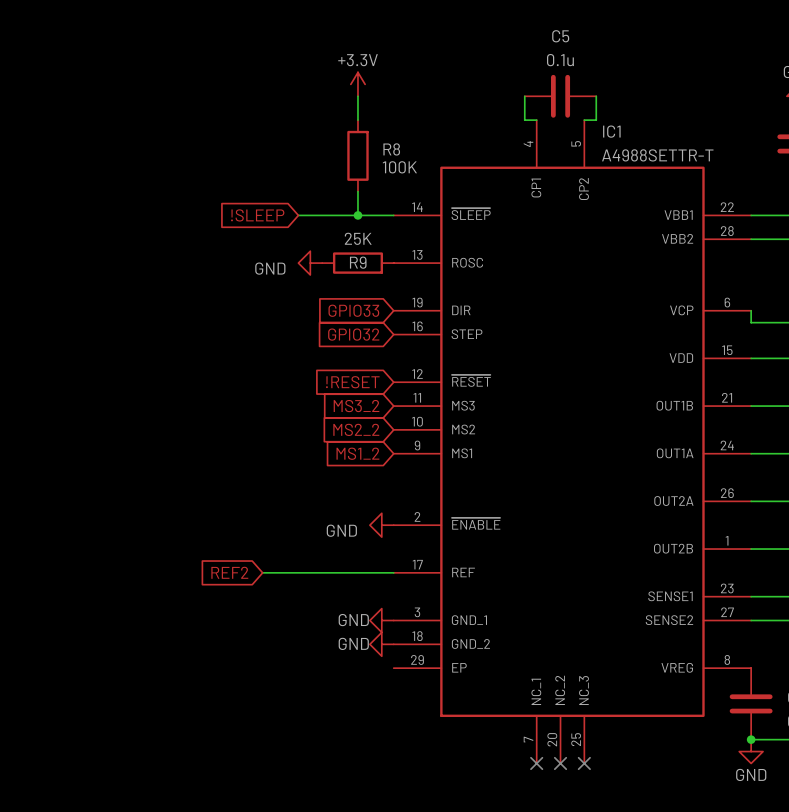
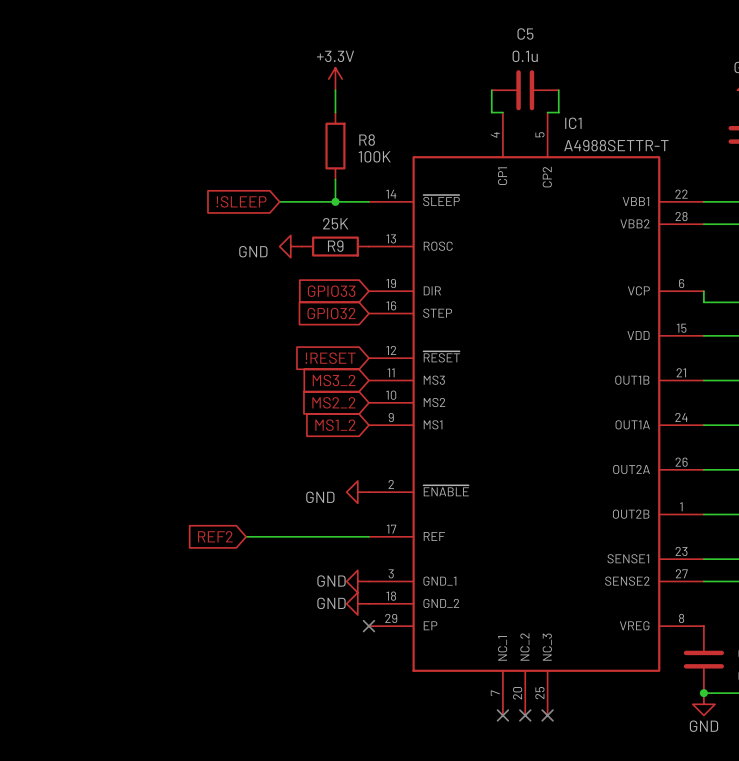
no-connect mark: none -> (368, 626)

